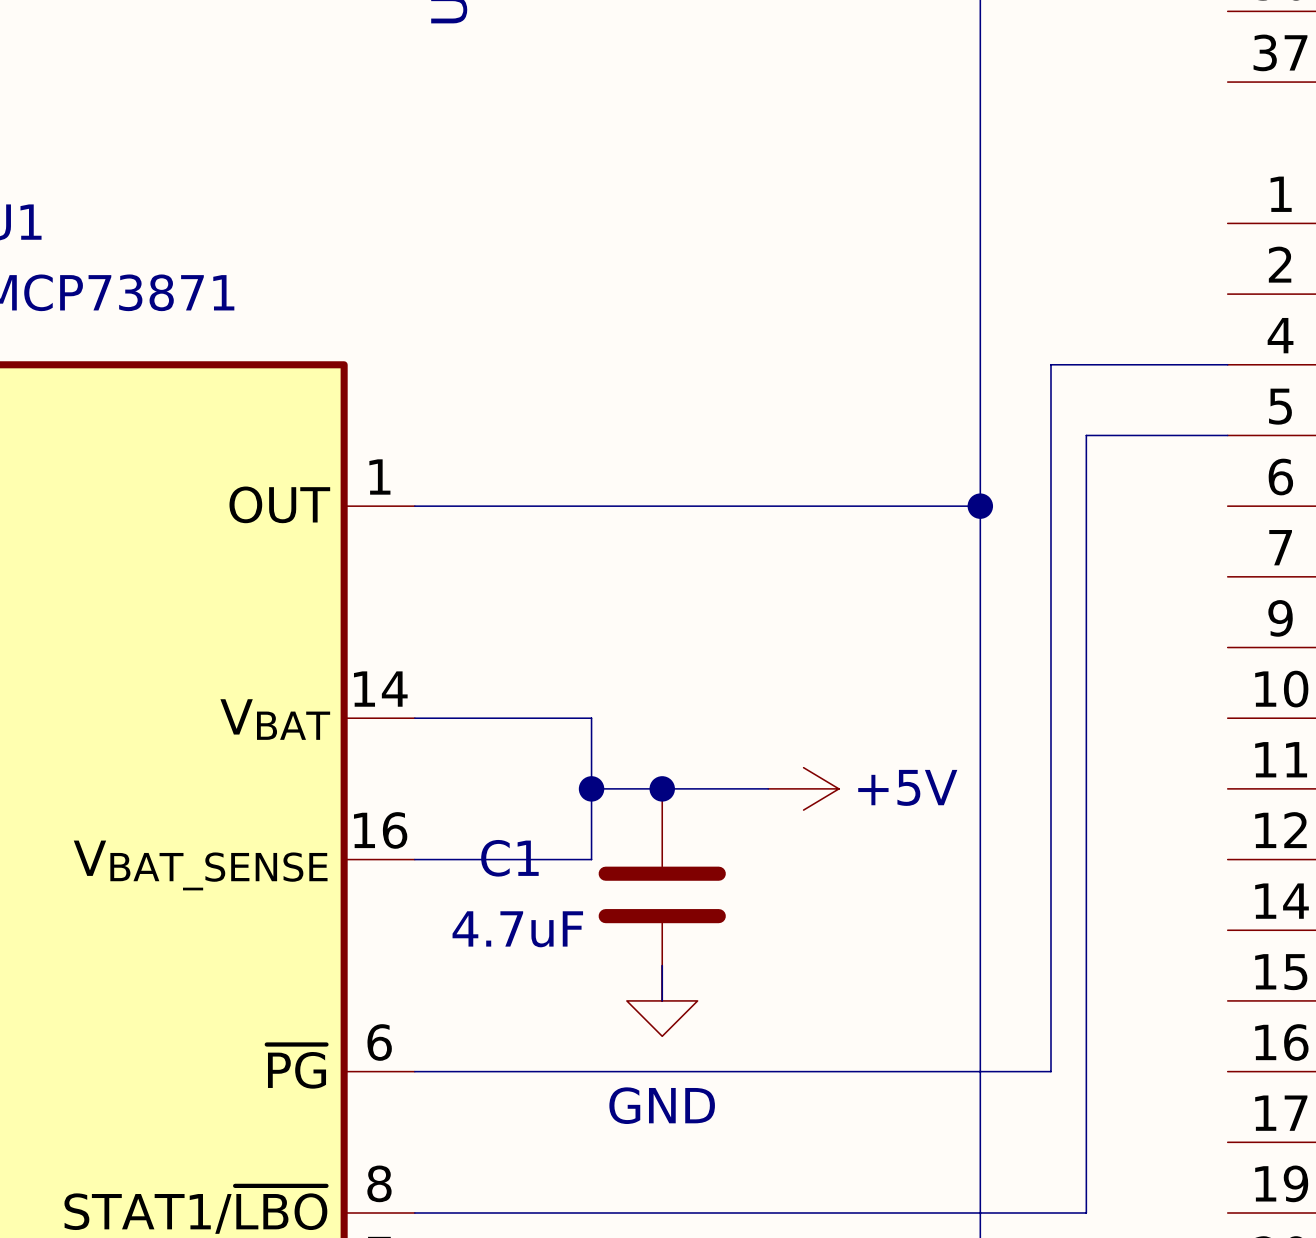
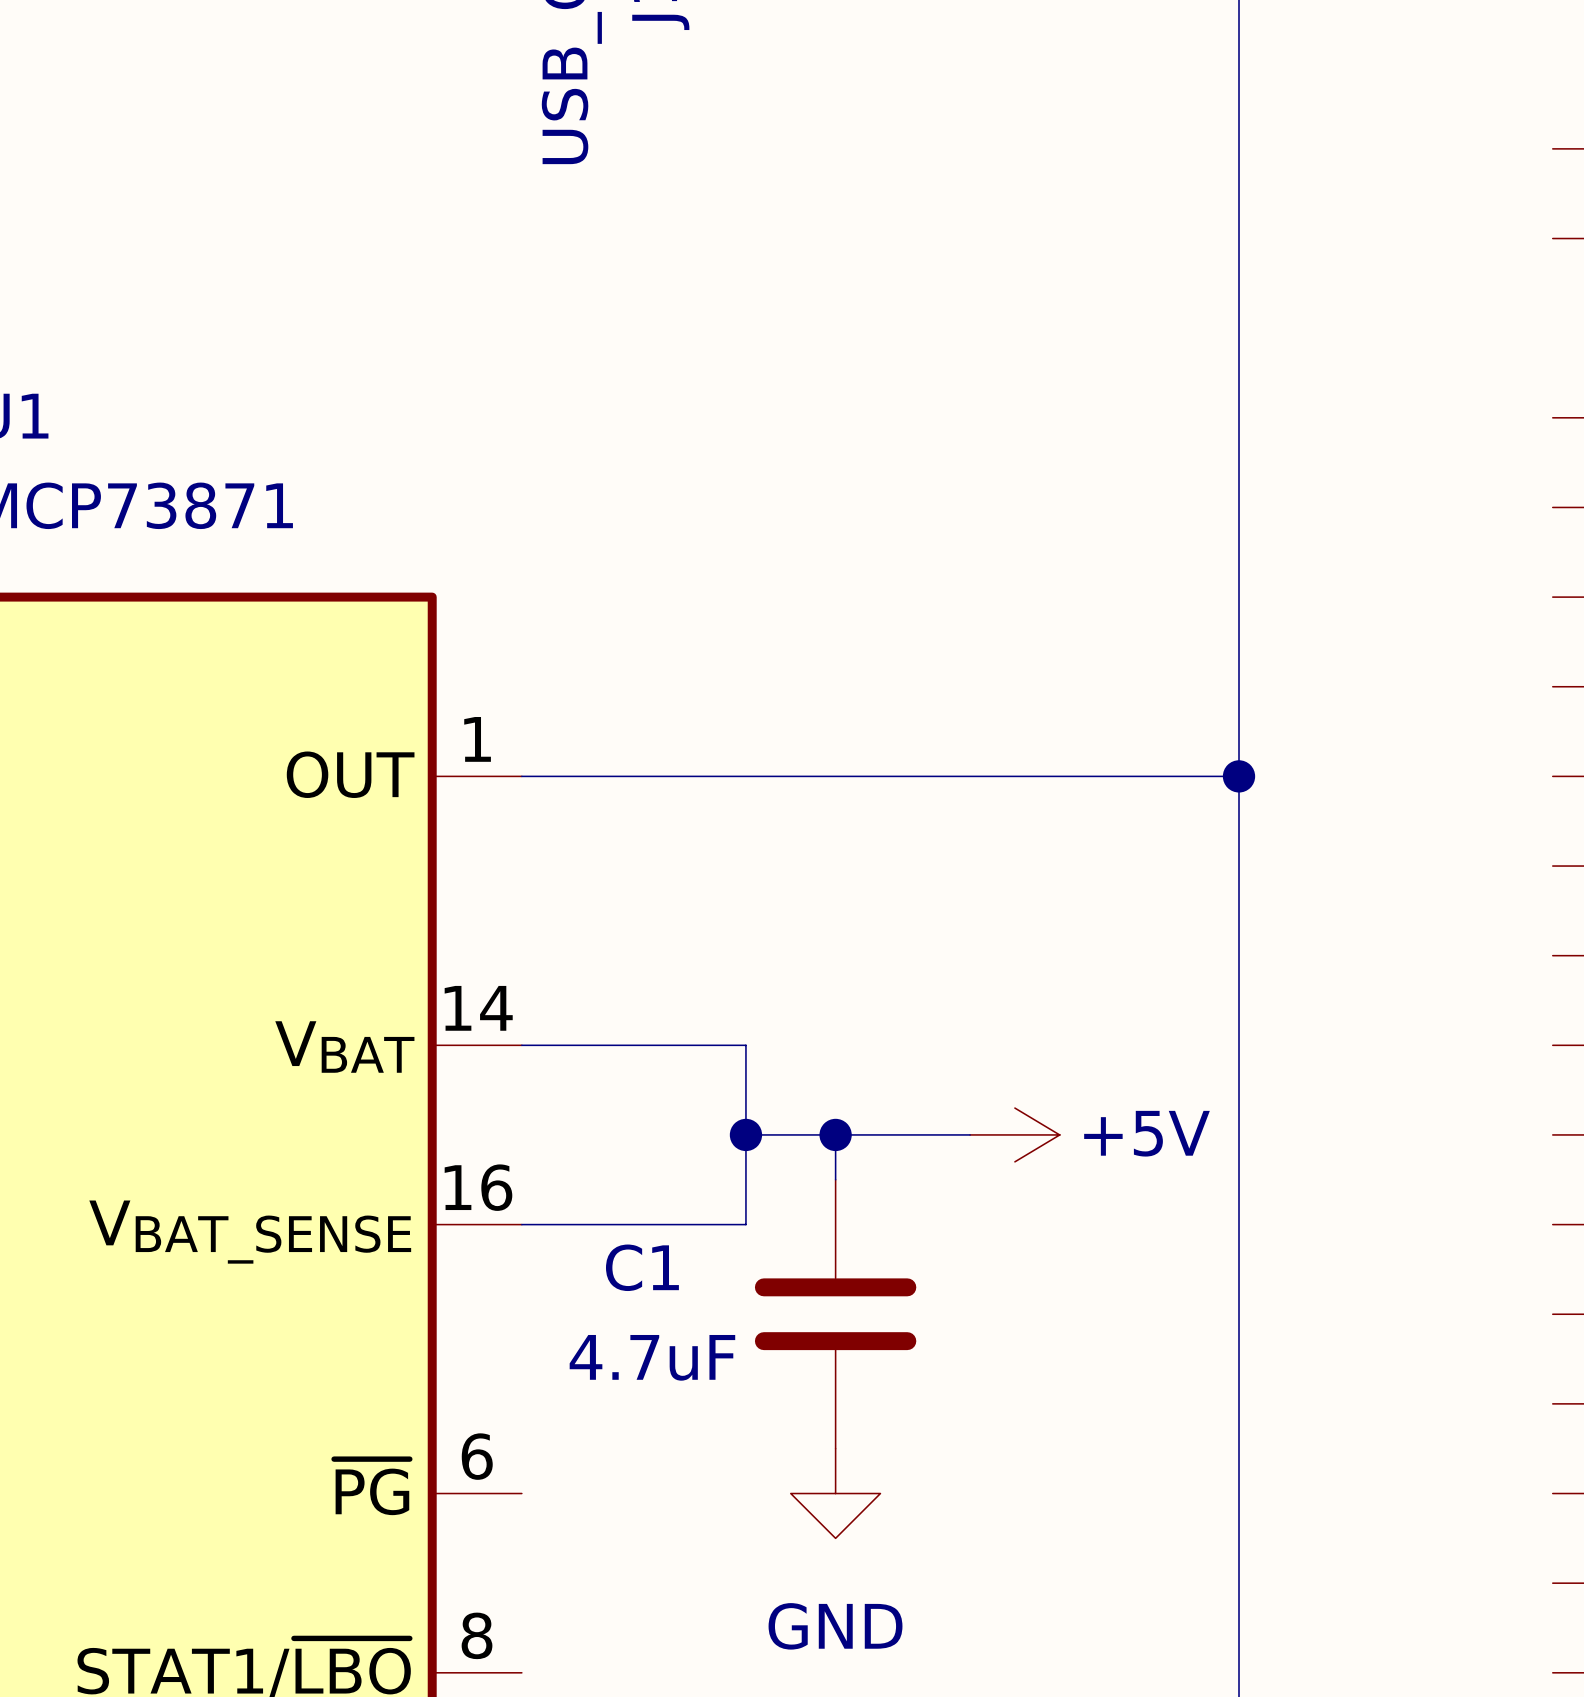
wire: (1227, 364) (1051, 364) (1051, 1071) (414, 1071) -> none
wire: (1227, 435) (1086, 435) (1086, 1212) (414, 1212) -> none
C1 position: (662, 894) -> (835, 1314)
power symbol position: GND (662, 1000) -> GND (835, 1493)

